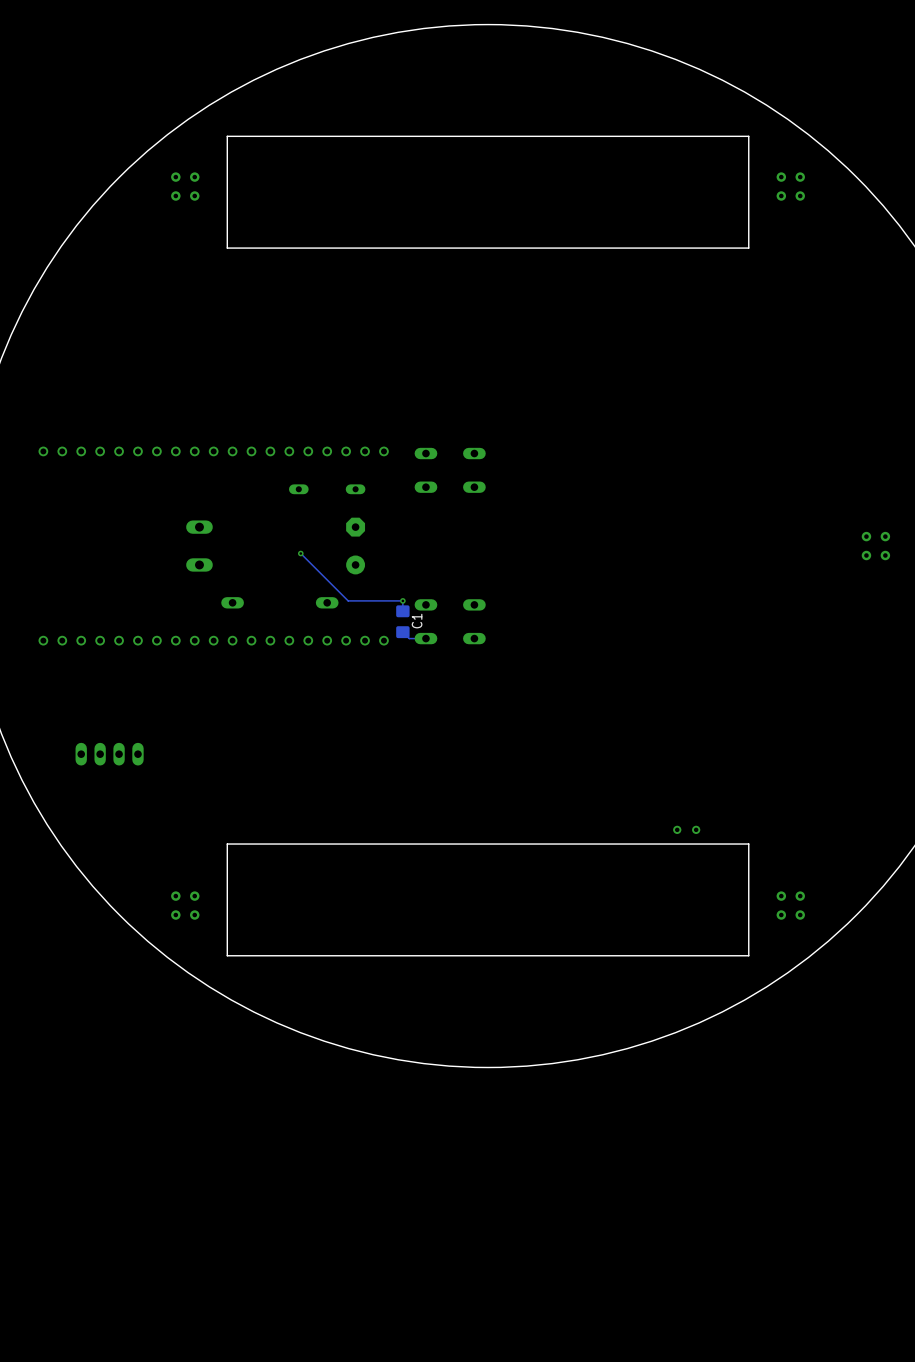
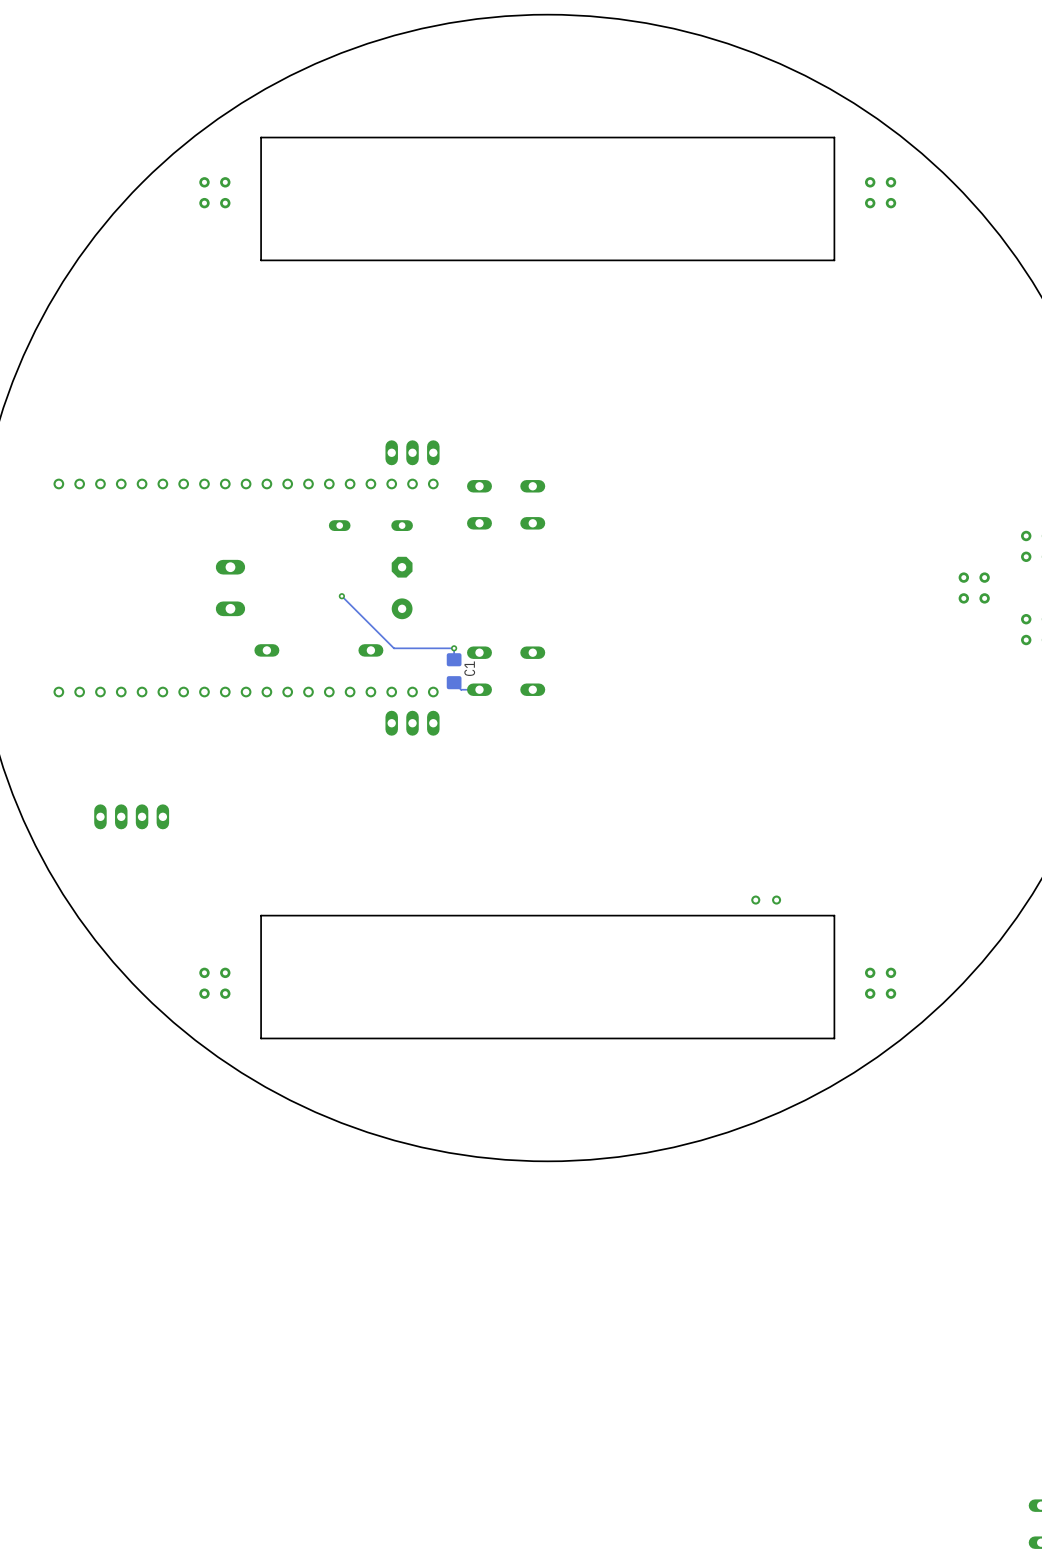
part: none -> (412, 452)
part: none -> (412, 723)

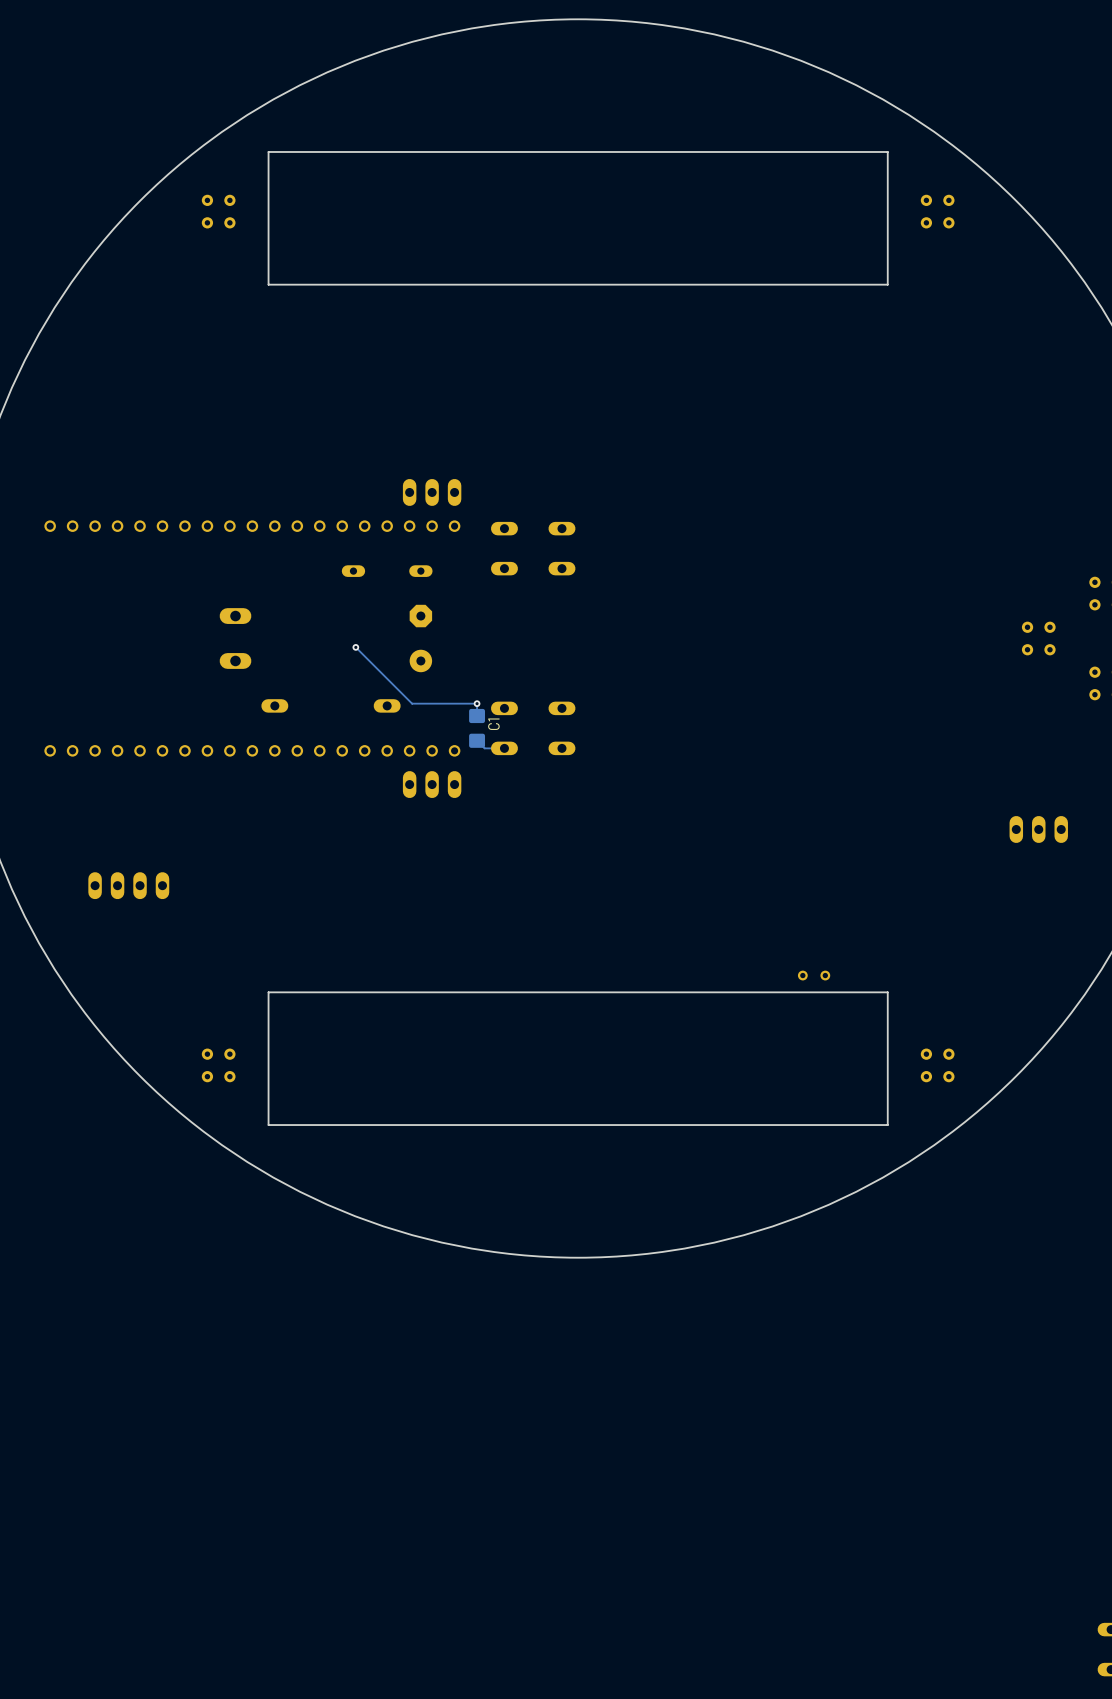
part: none -> (1038, 829)

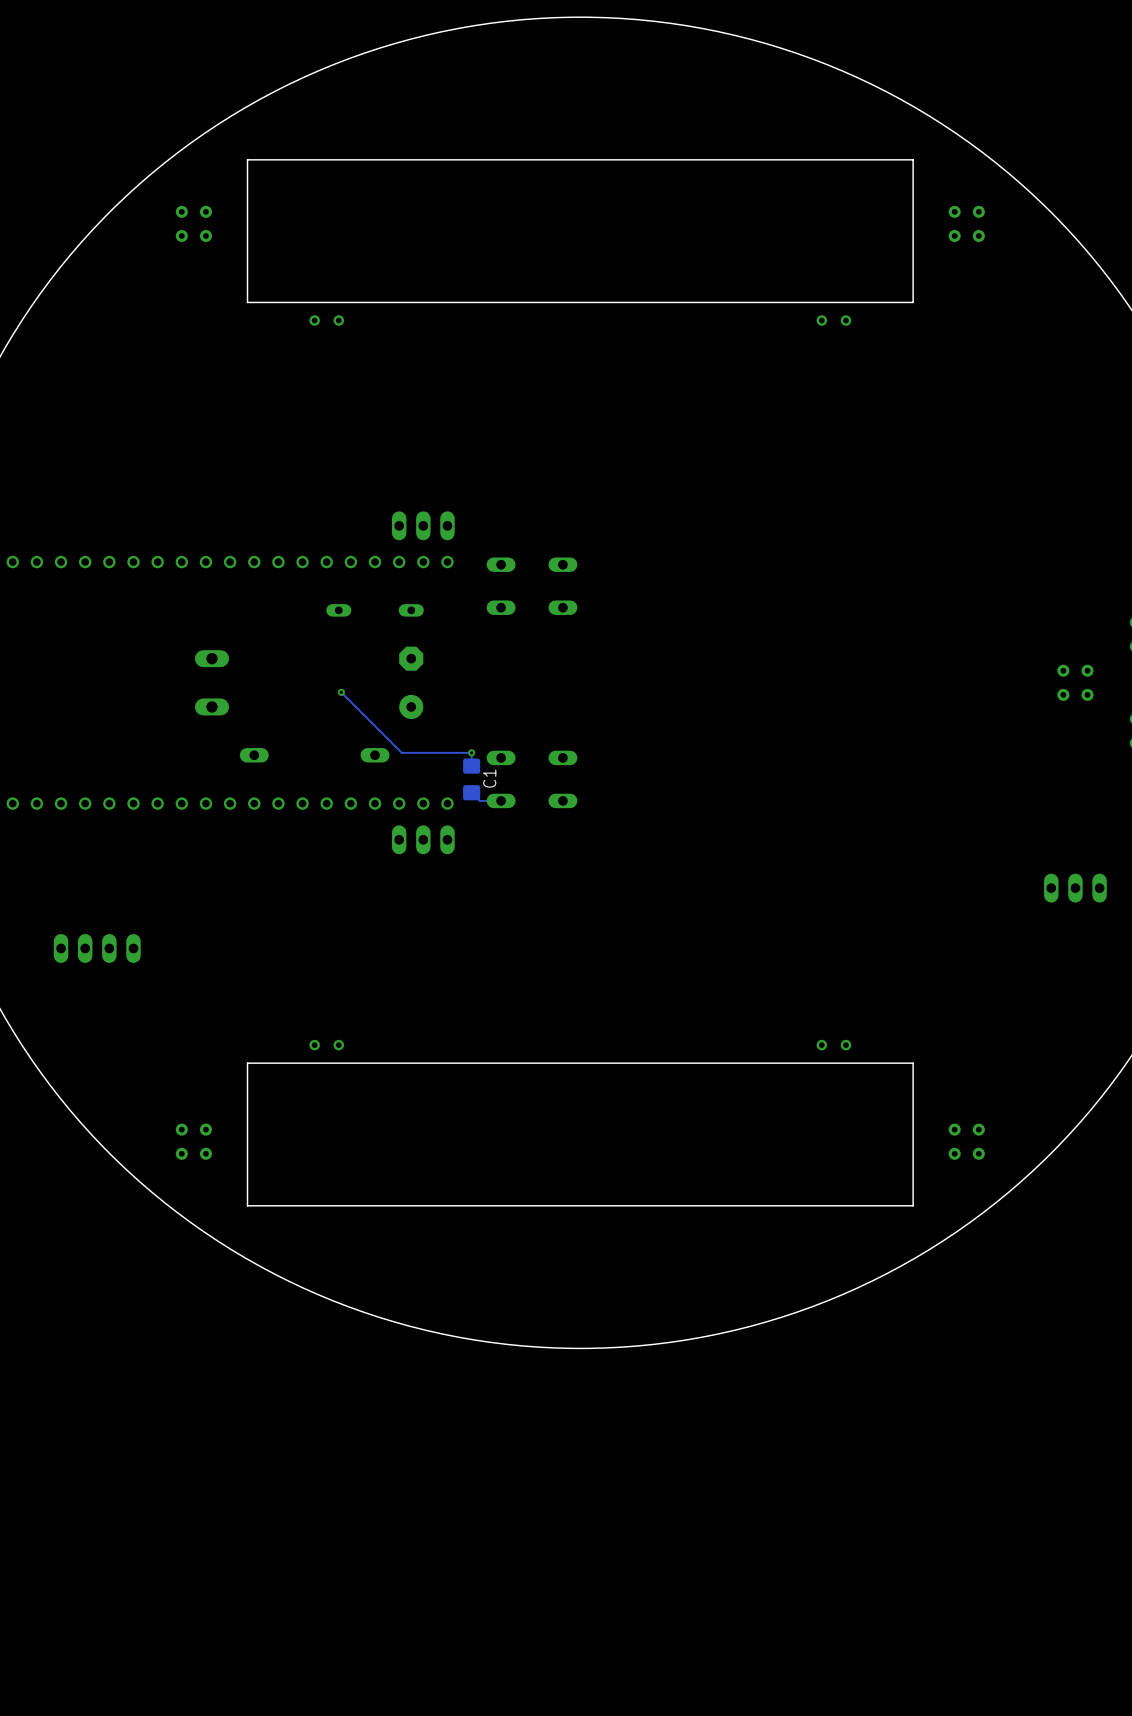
part: none -> (326, 320)
part: none -> (833, 320)
part: none -> (326, 1045)

